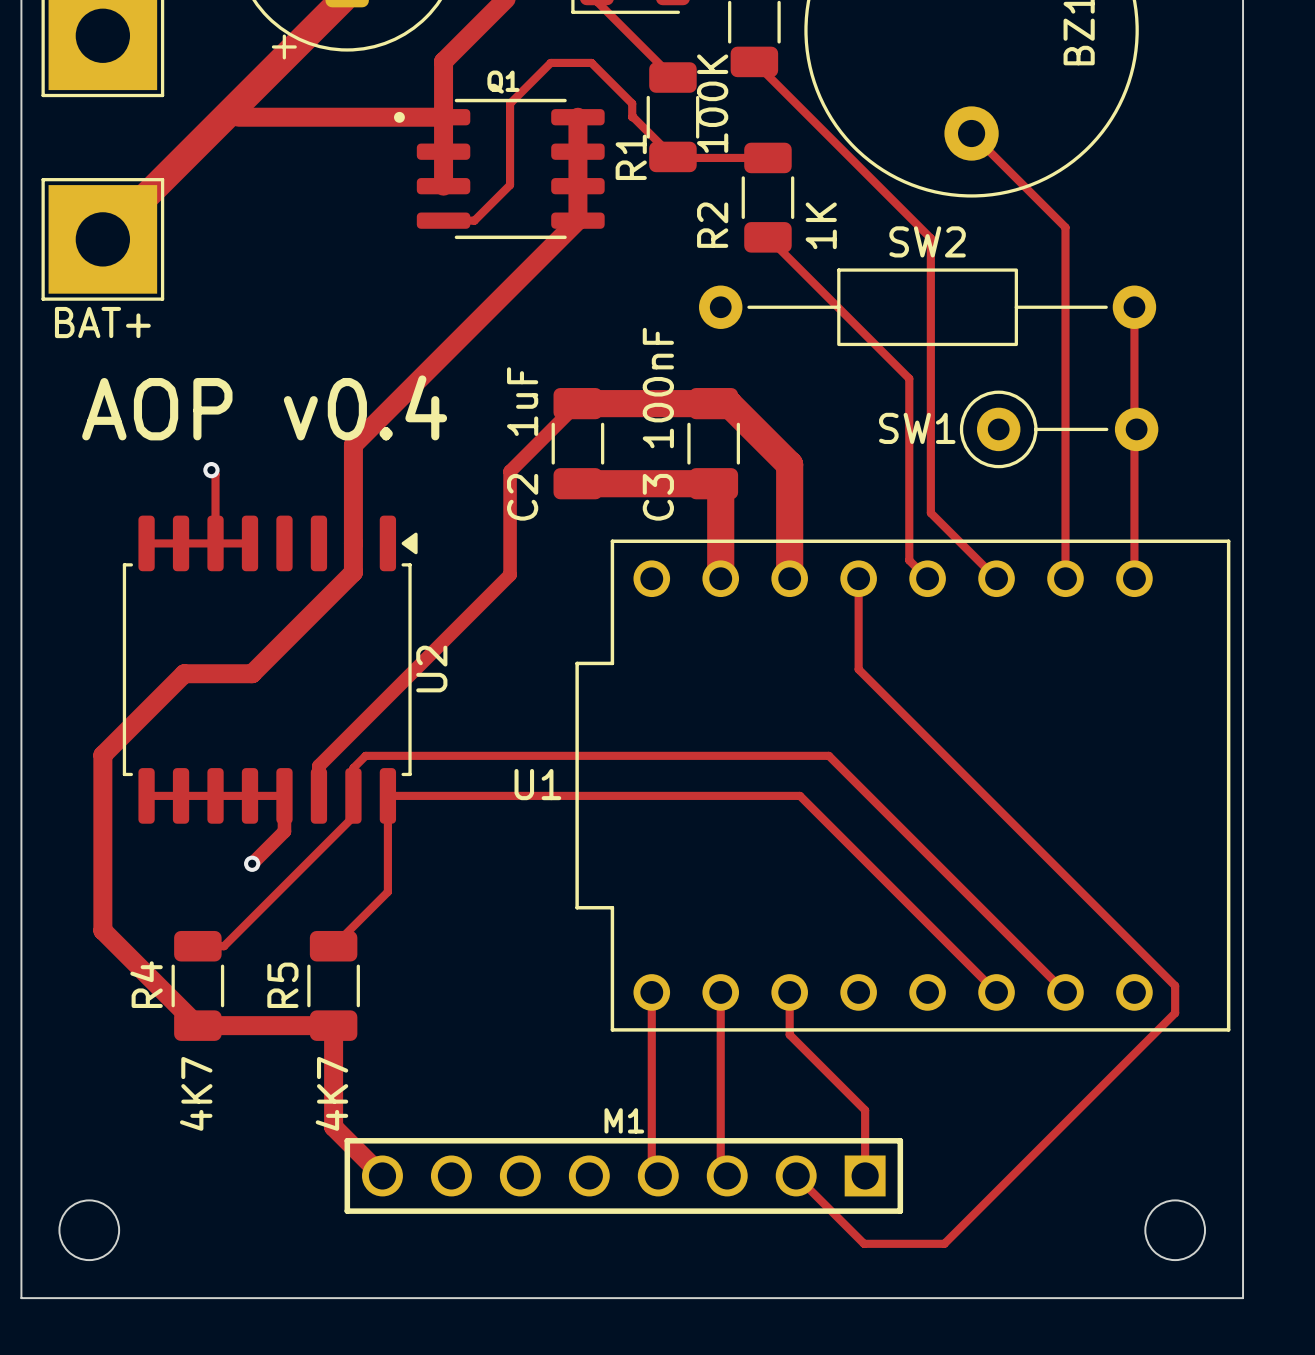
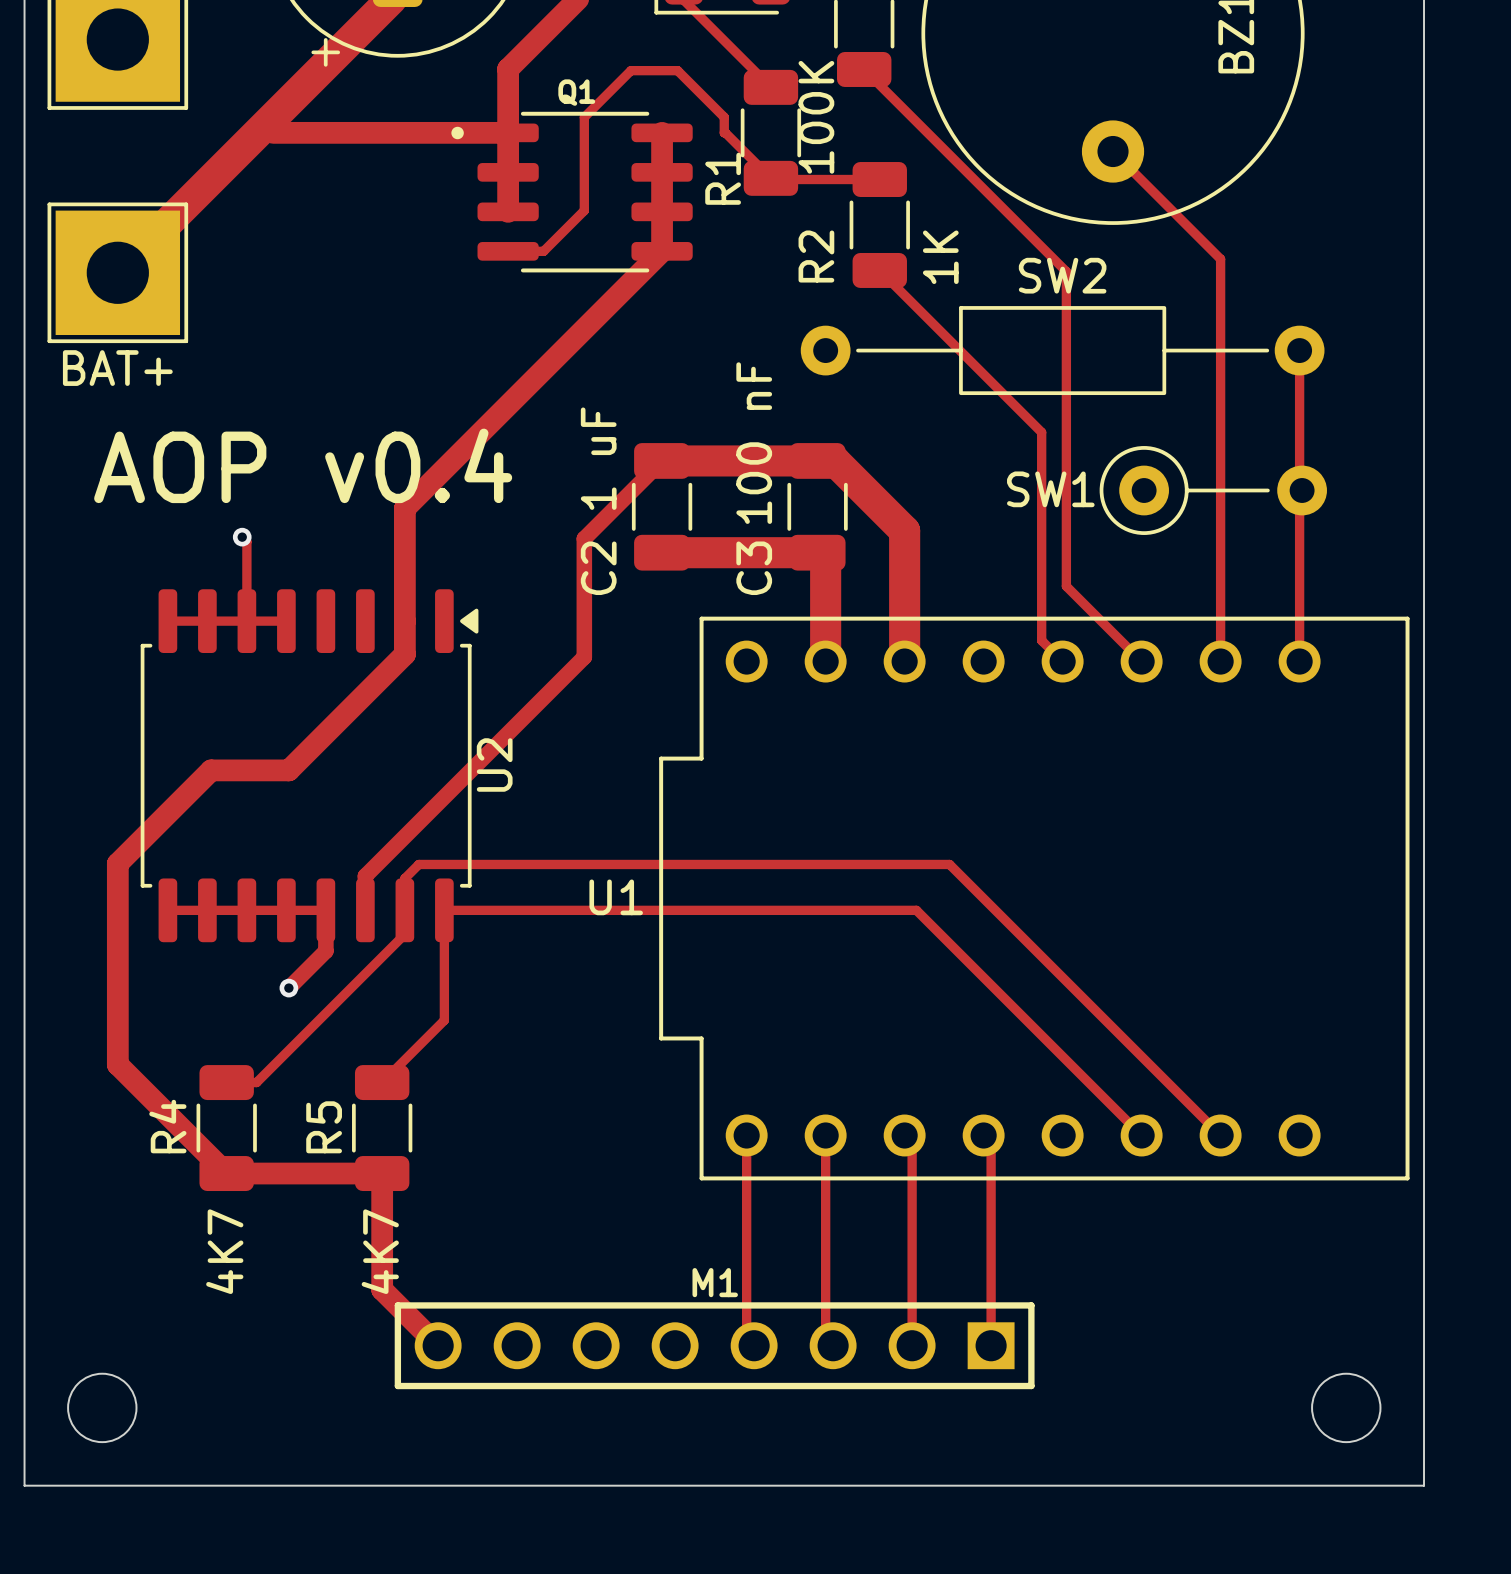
C3 value: 100nF (658, 388) -> 100 nF (754, 443)
C2 value: 1uF (522, 401) -> 1 uF (598, 458)
track: (858, 578) (858, 669) (1175, 985) (1175, 1013) (944, 1243) (864, 1243) (796, 1175) -> (904, 1135) (912, 1142) (912, 1345)
track: (789, 1003) (789, 1034) (865, 1110) -> (983, 1135) (991, 1142) (991, 1270)

